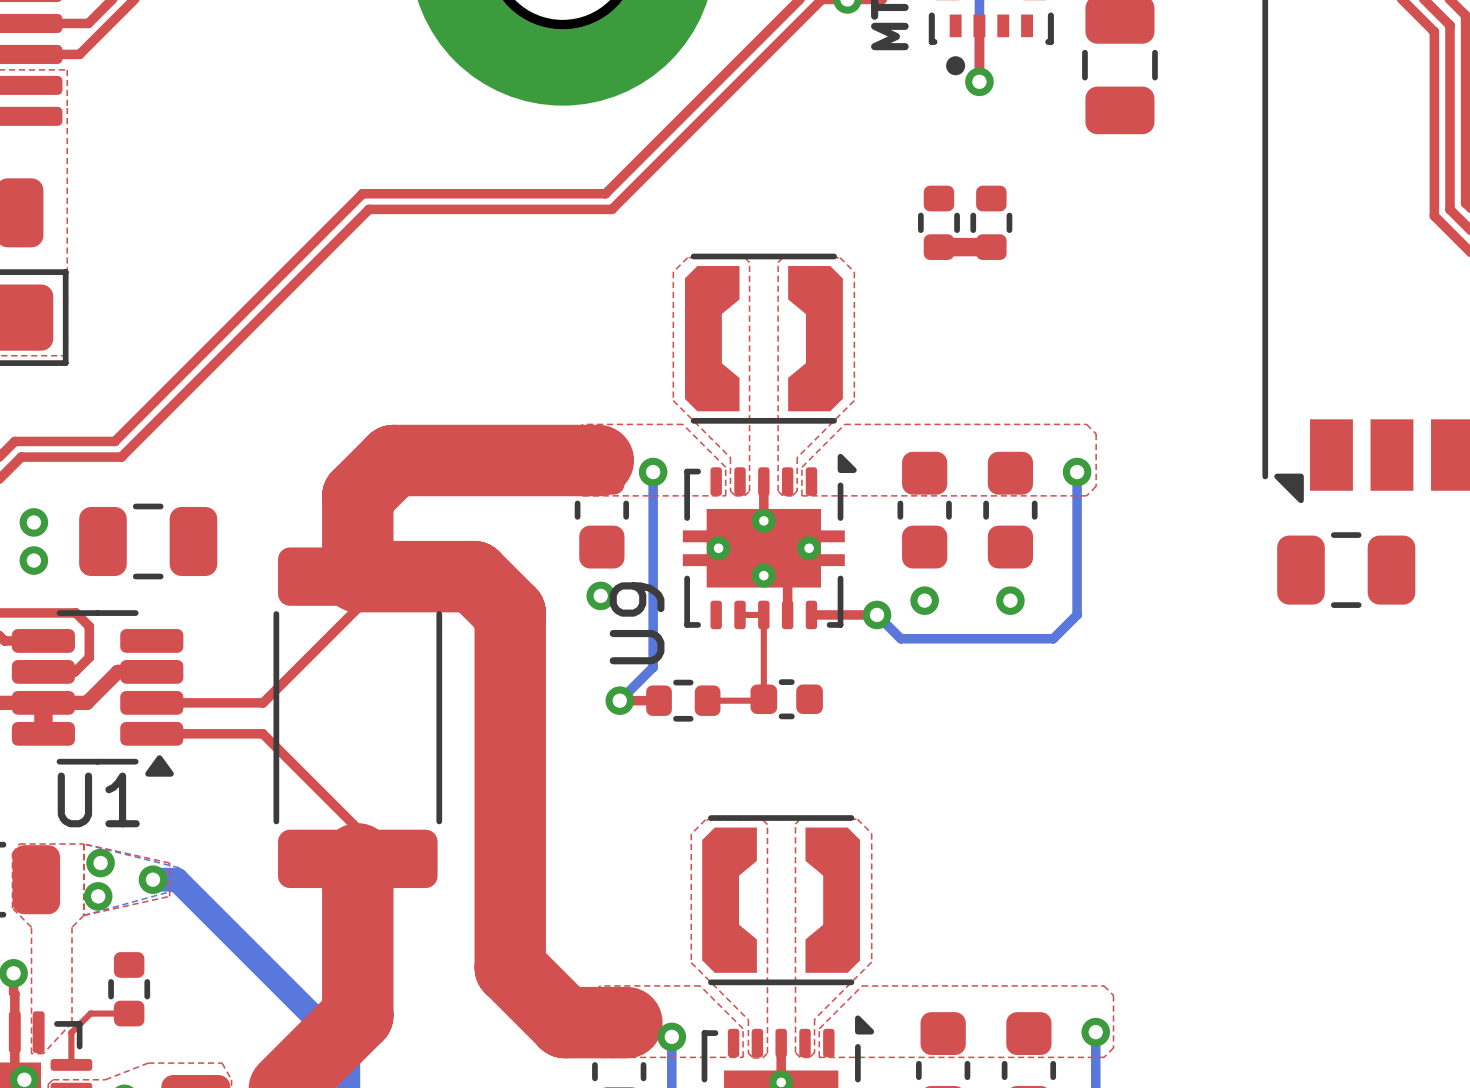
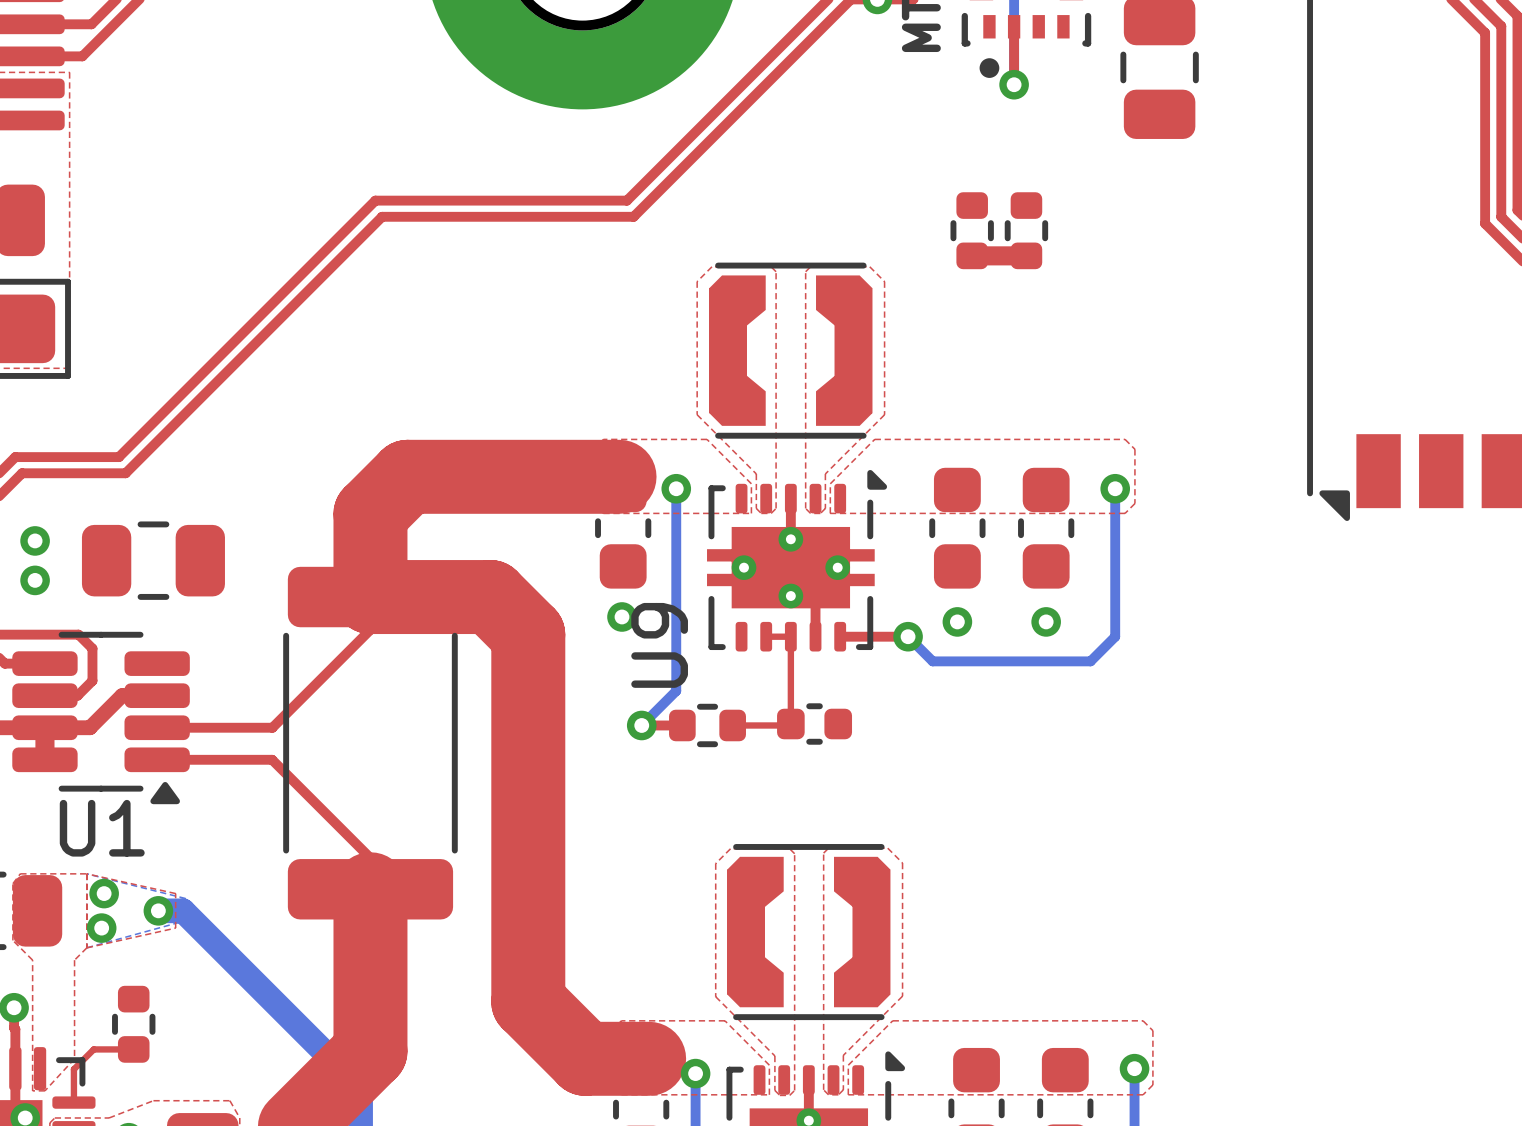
part: (1346, 570) -> none

